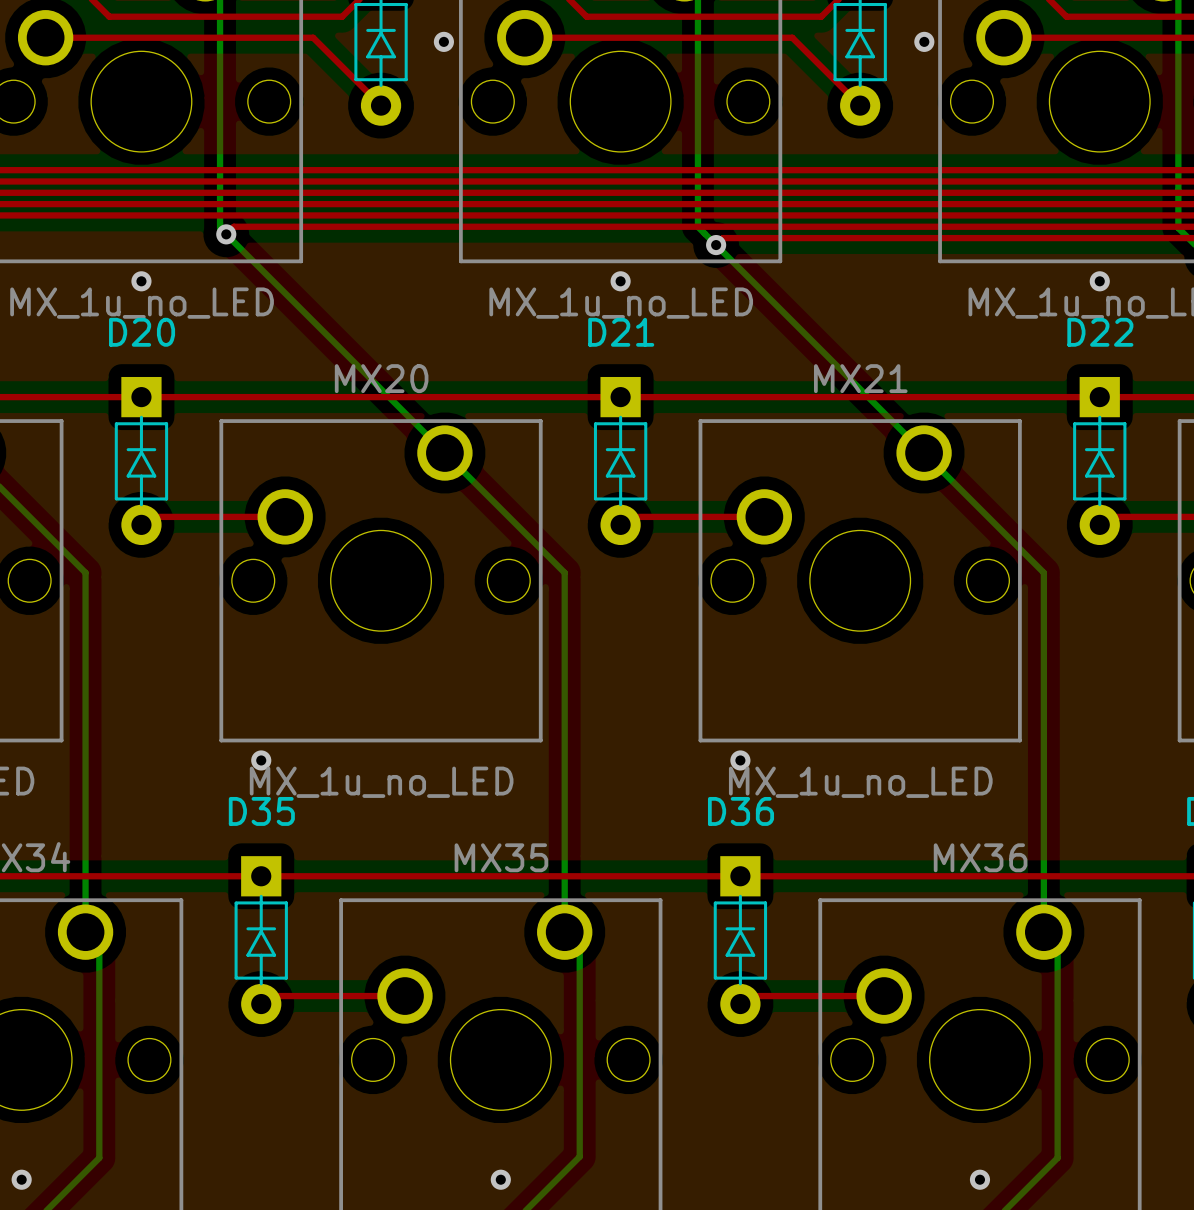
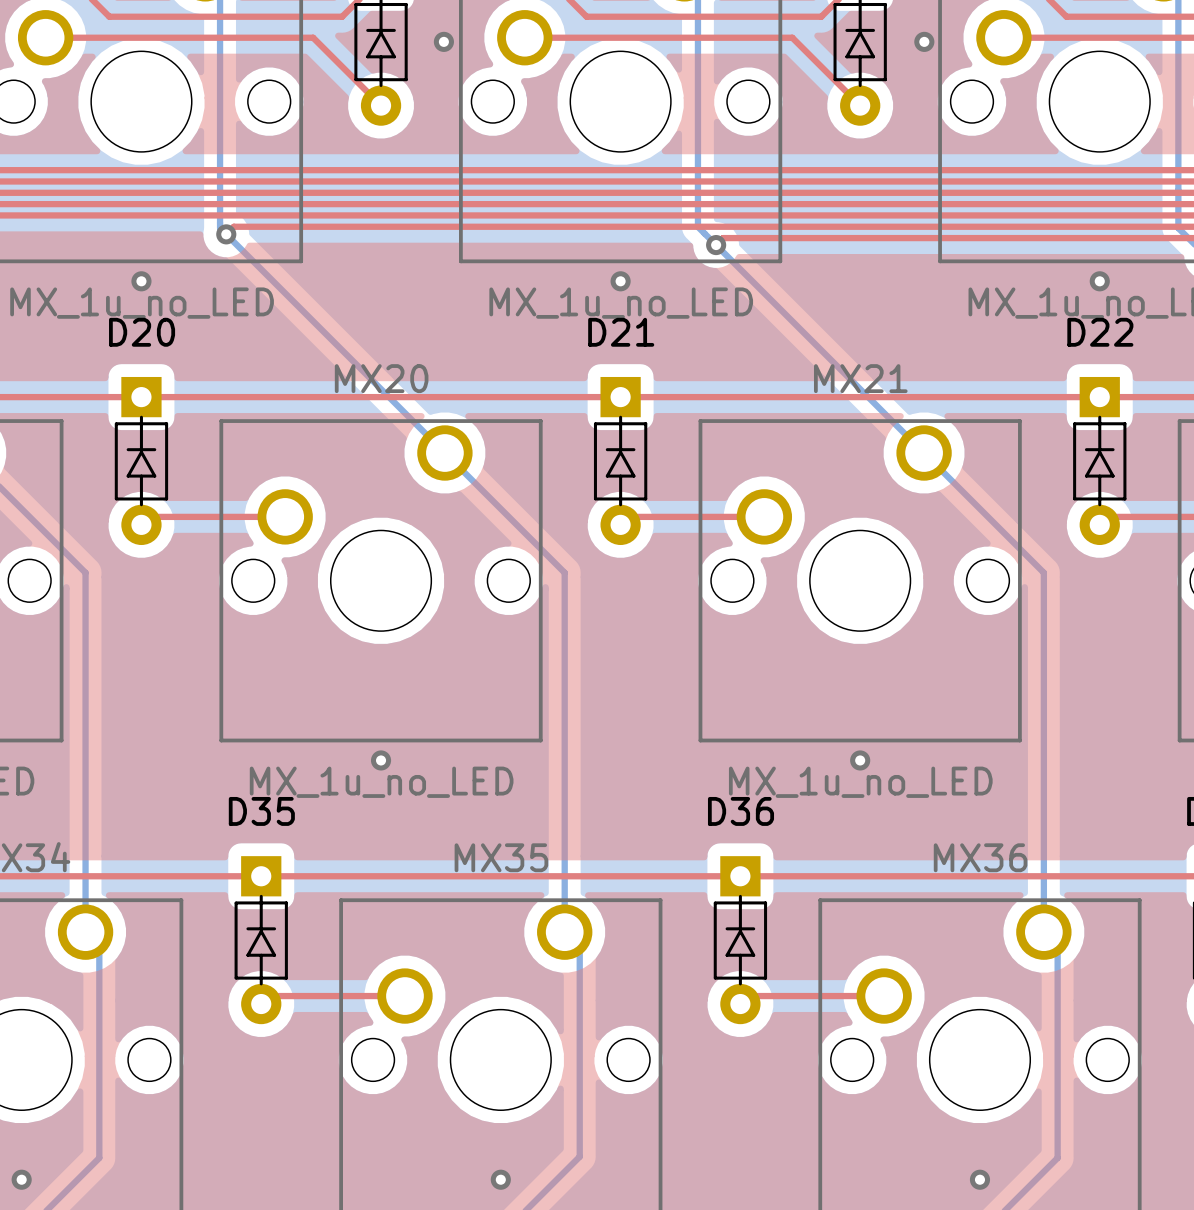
via position: (261, 760) -> (381, 760)
via position: (740, 760) -> (860, 760)

